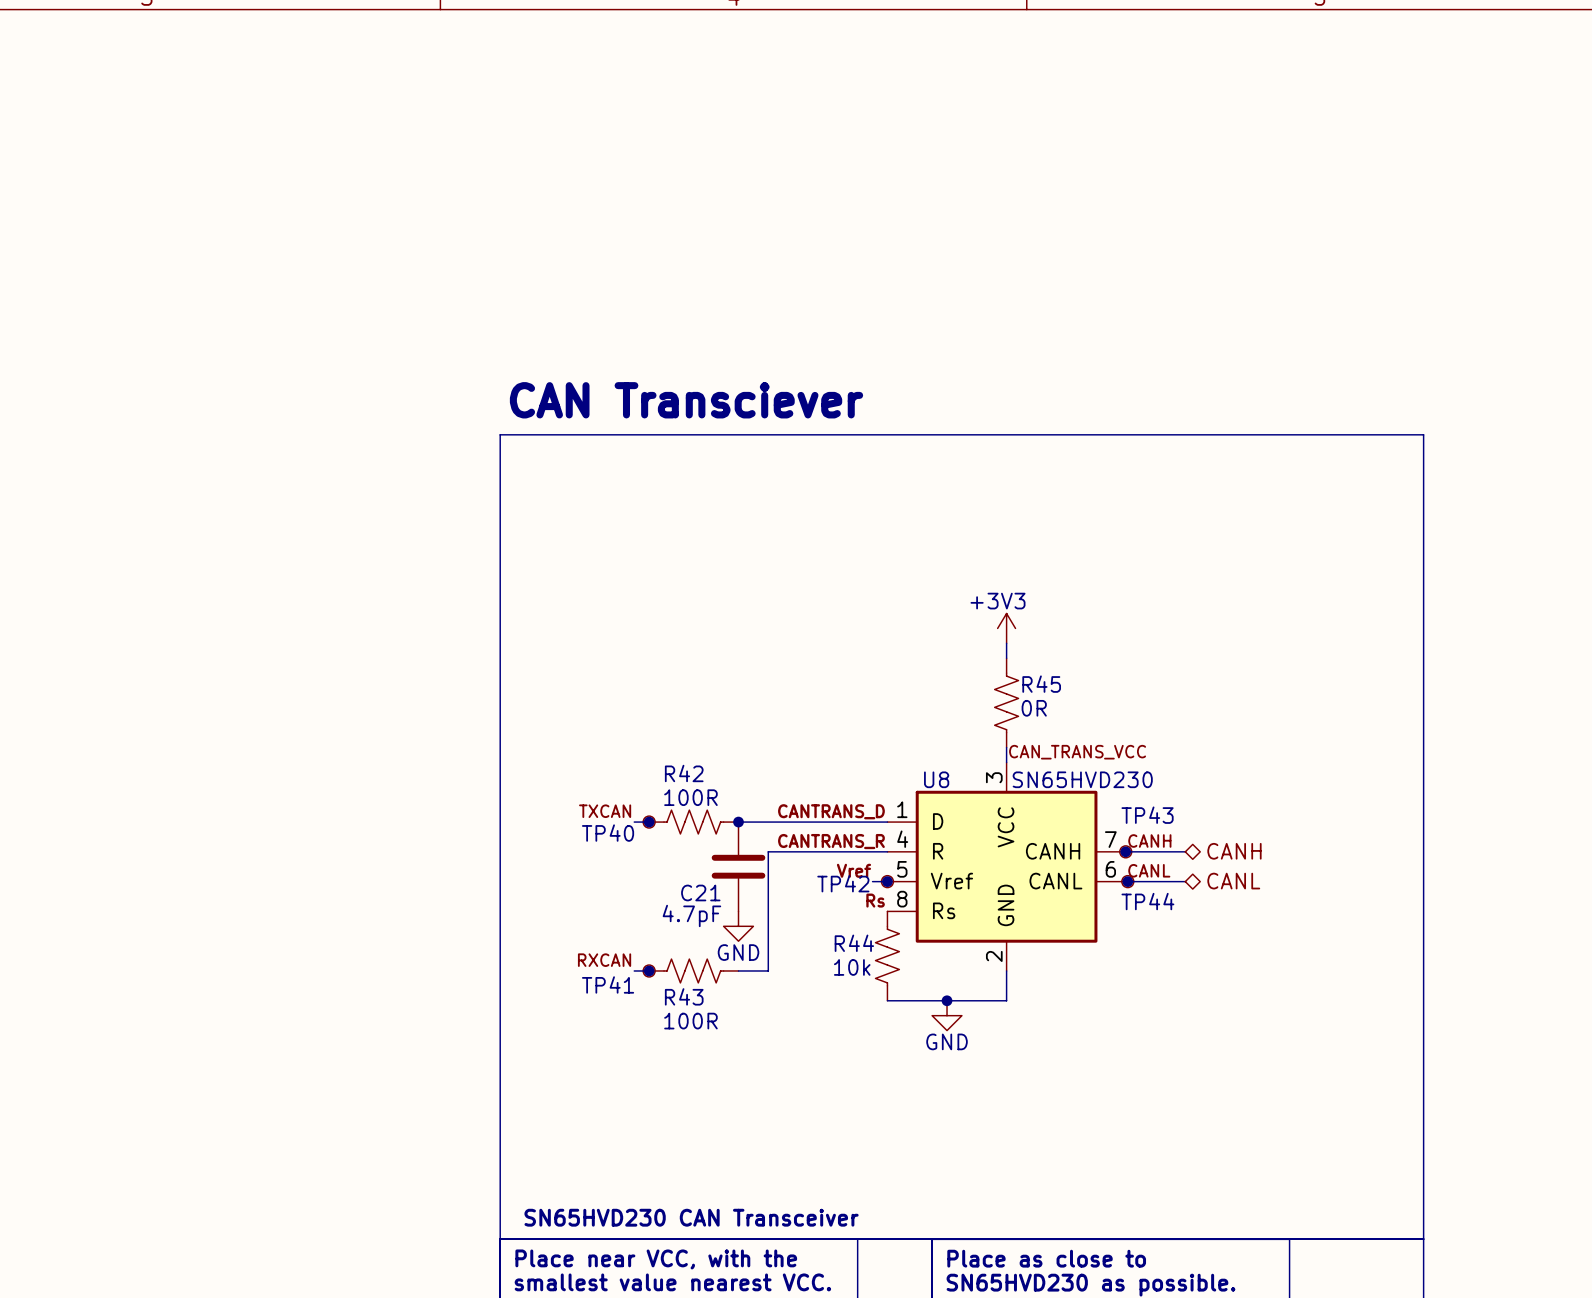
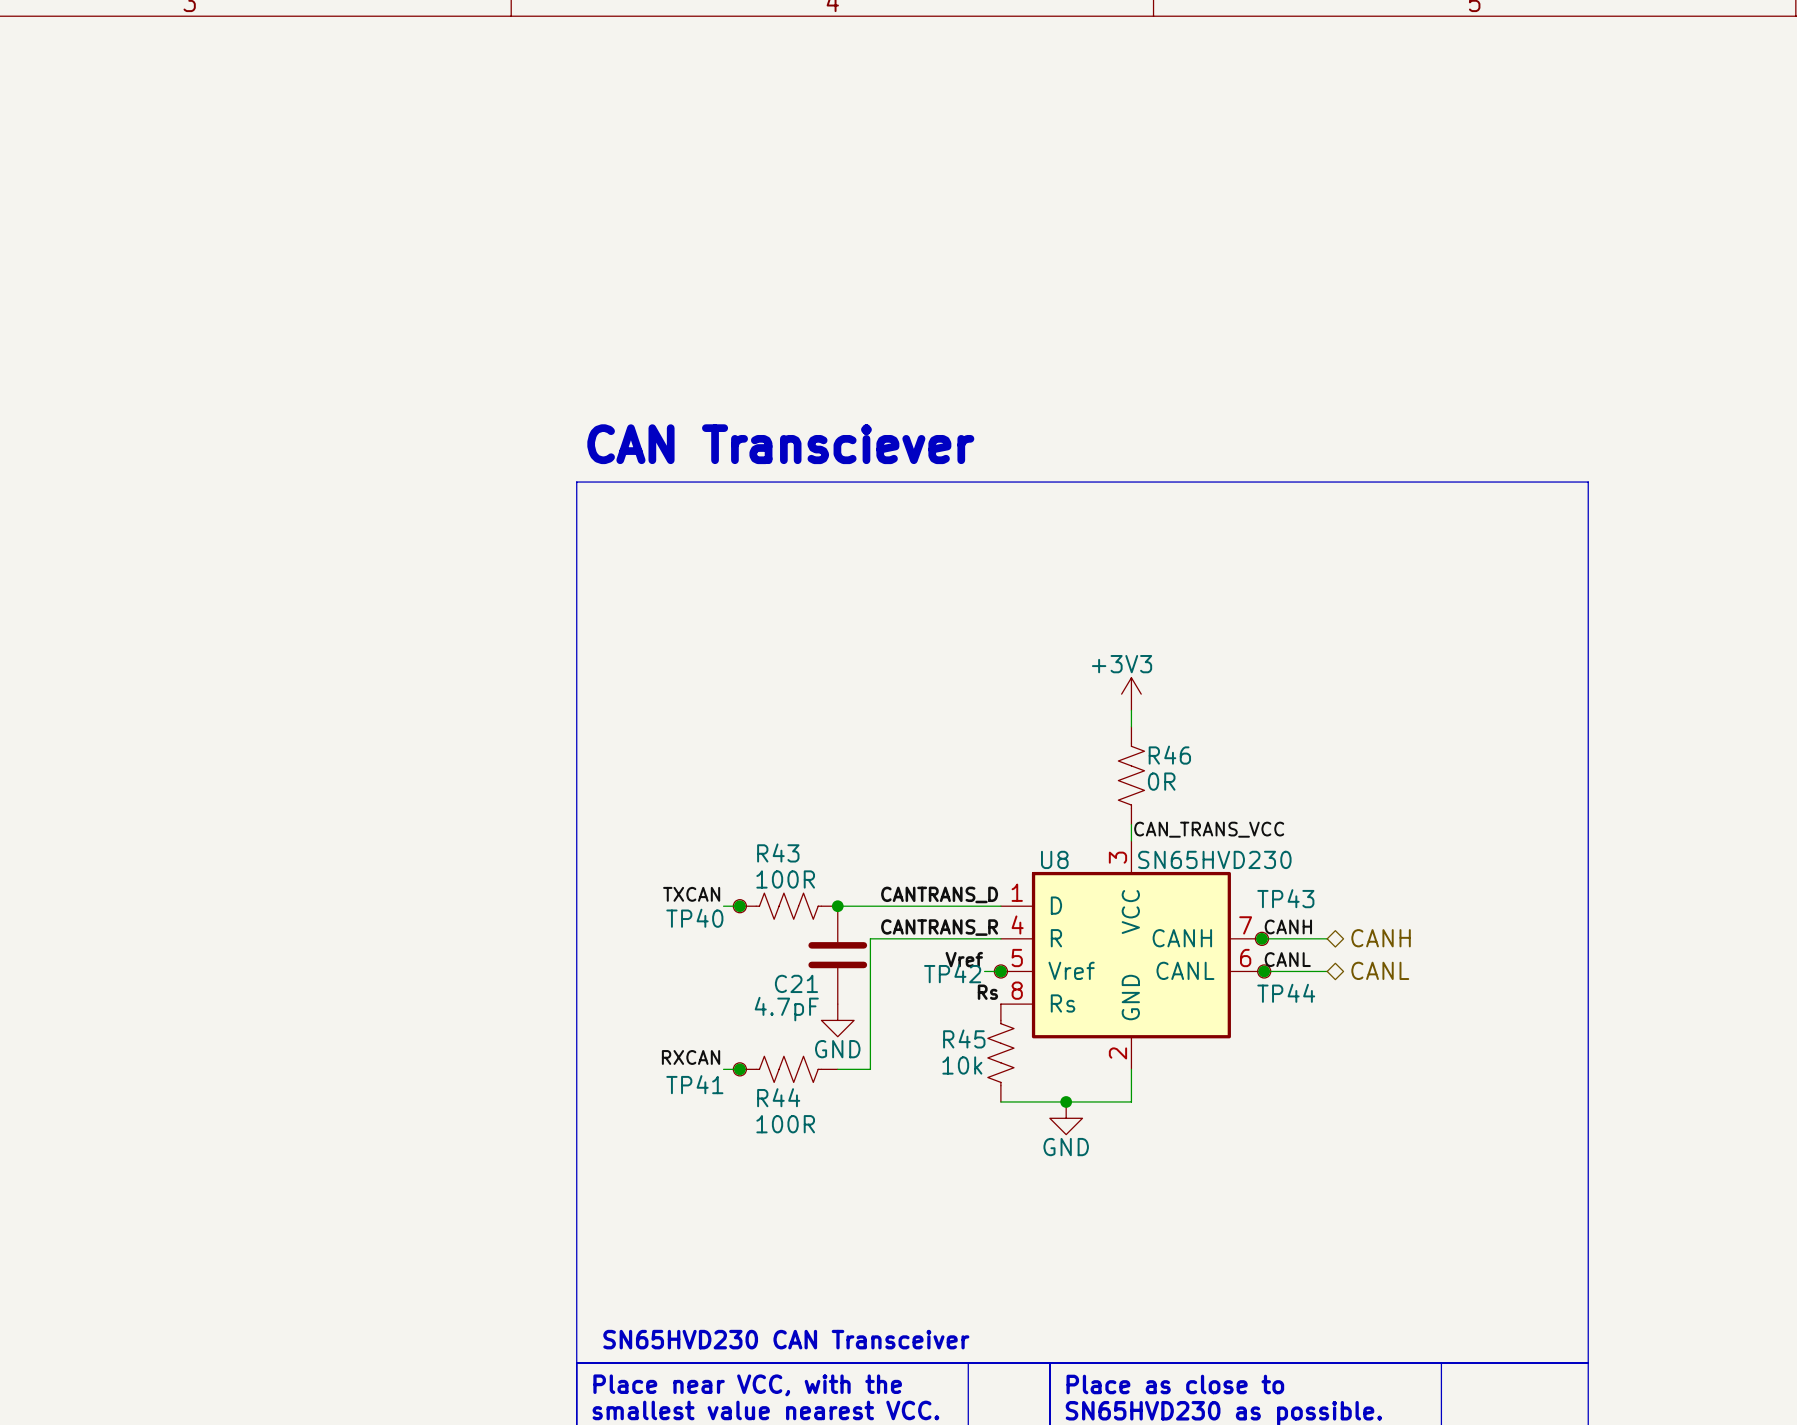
R45 name: R45 (1041, 684) -> R46 (1169, 755)
R42 name: R42 (684, 773) -> R43 (778, 853)
R44 name: R44 (854, 943) -> R45 (964, 1038)
R43 name: R43 (684, 996) -> R44 (778, 1097)

